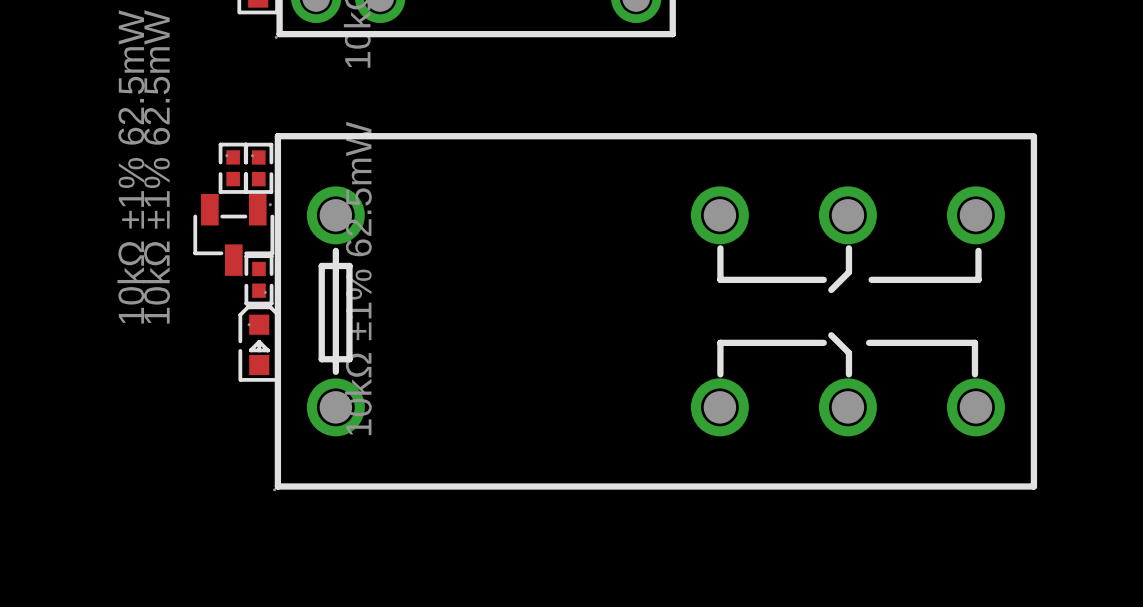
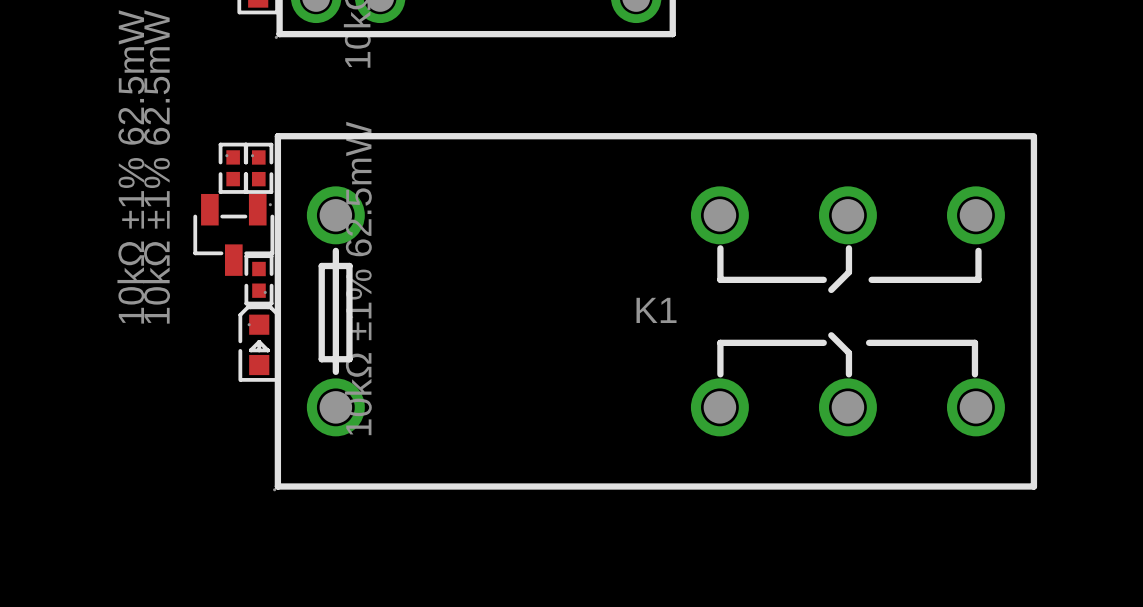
K1 name: none -> K1 (656, 310)

